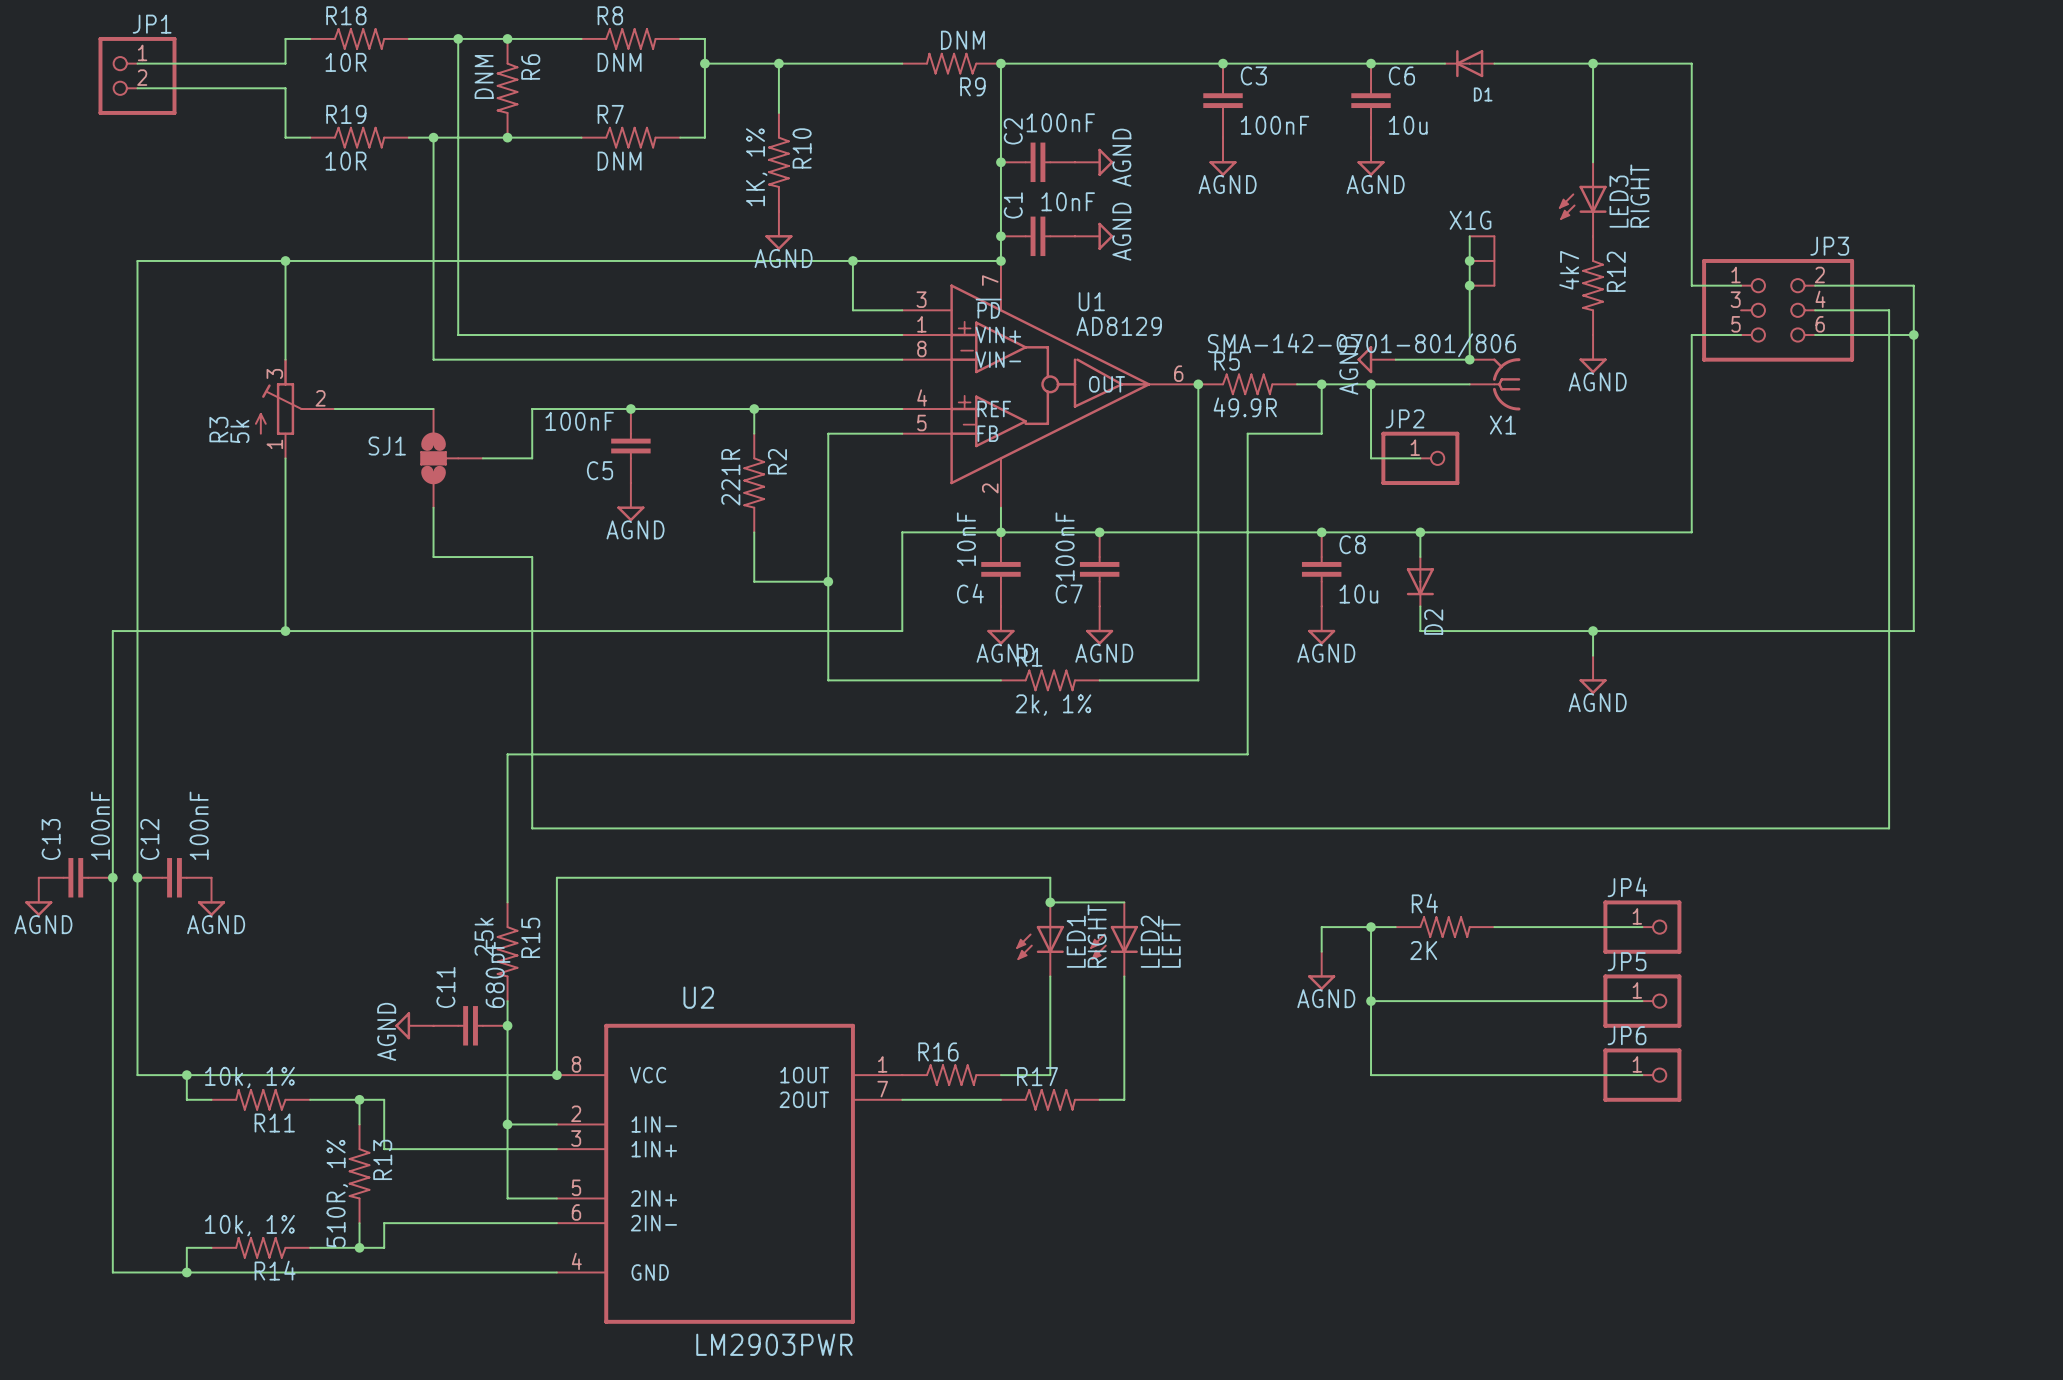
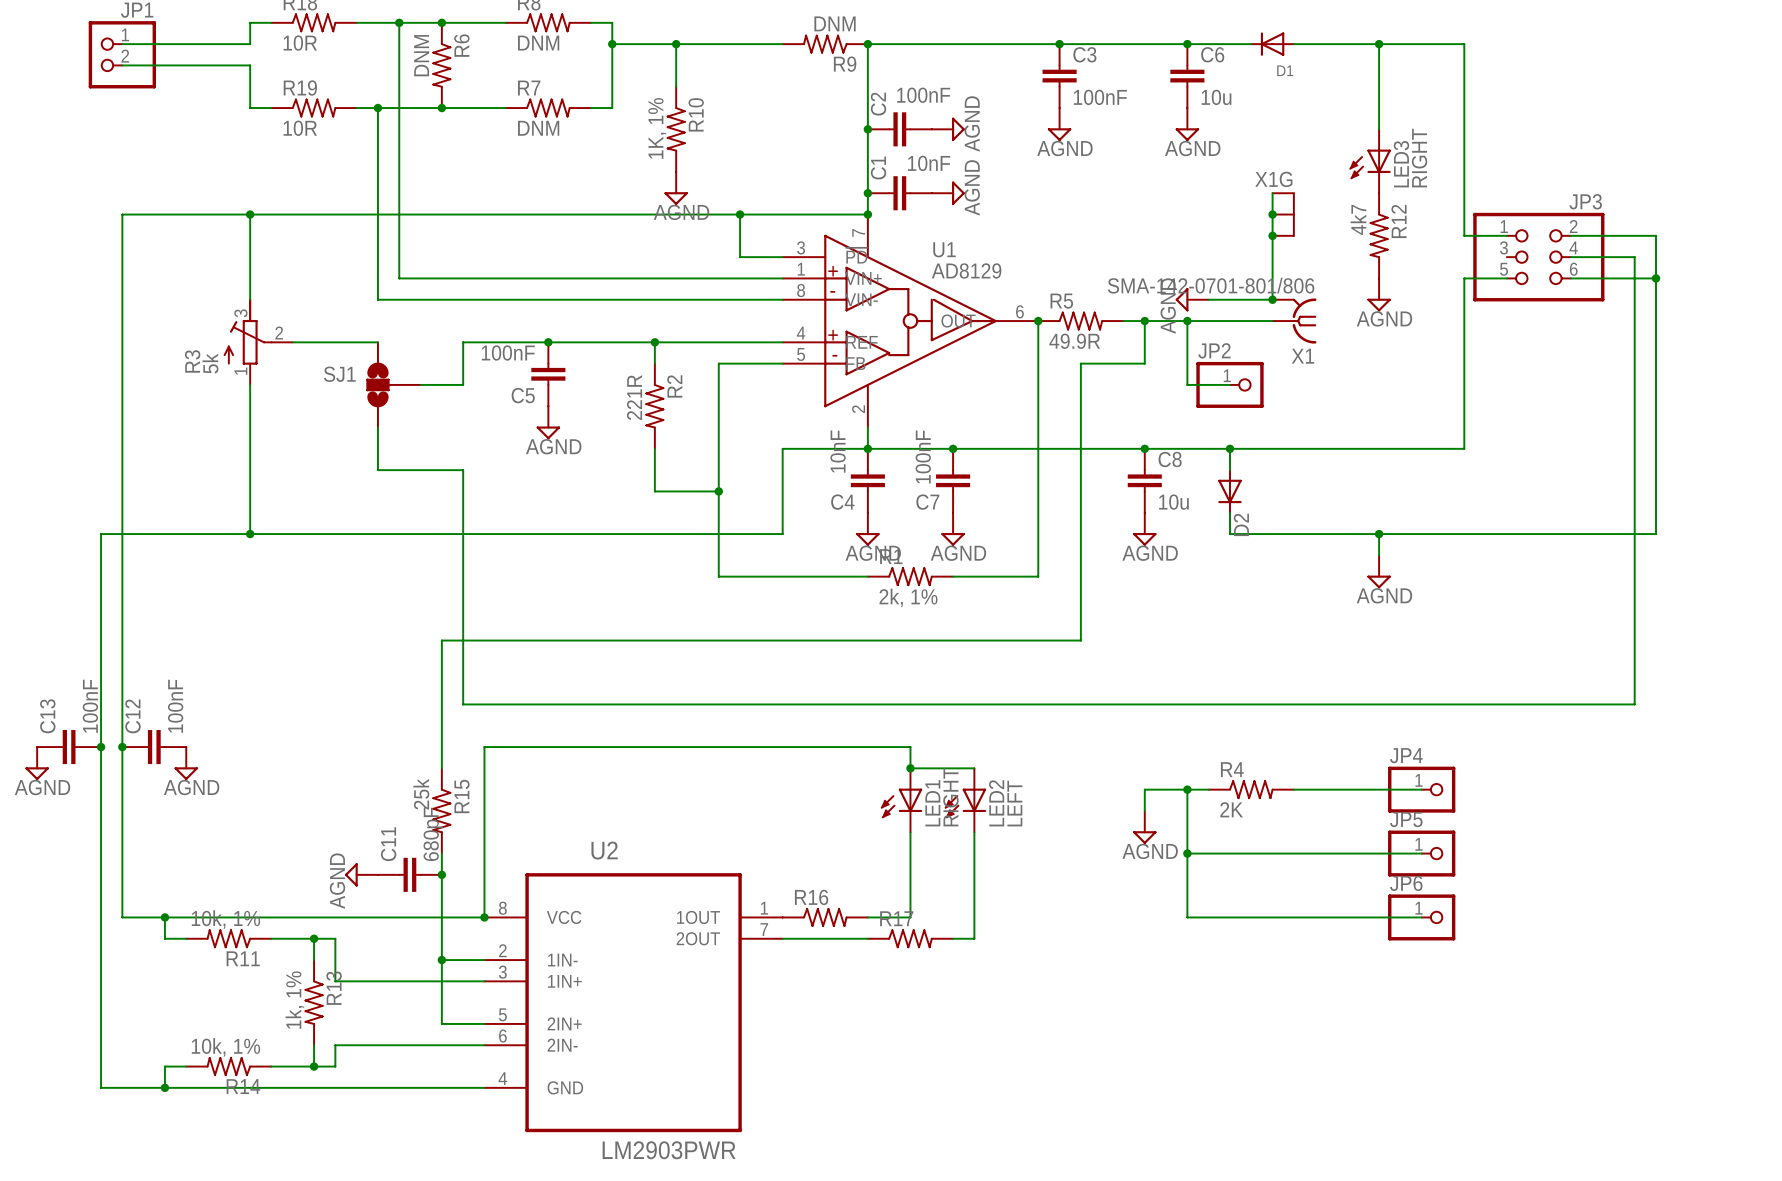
R13 value: 510R, 1% (337, 1193) -> 1k, 1% (294, 1000)

